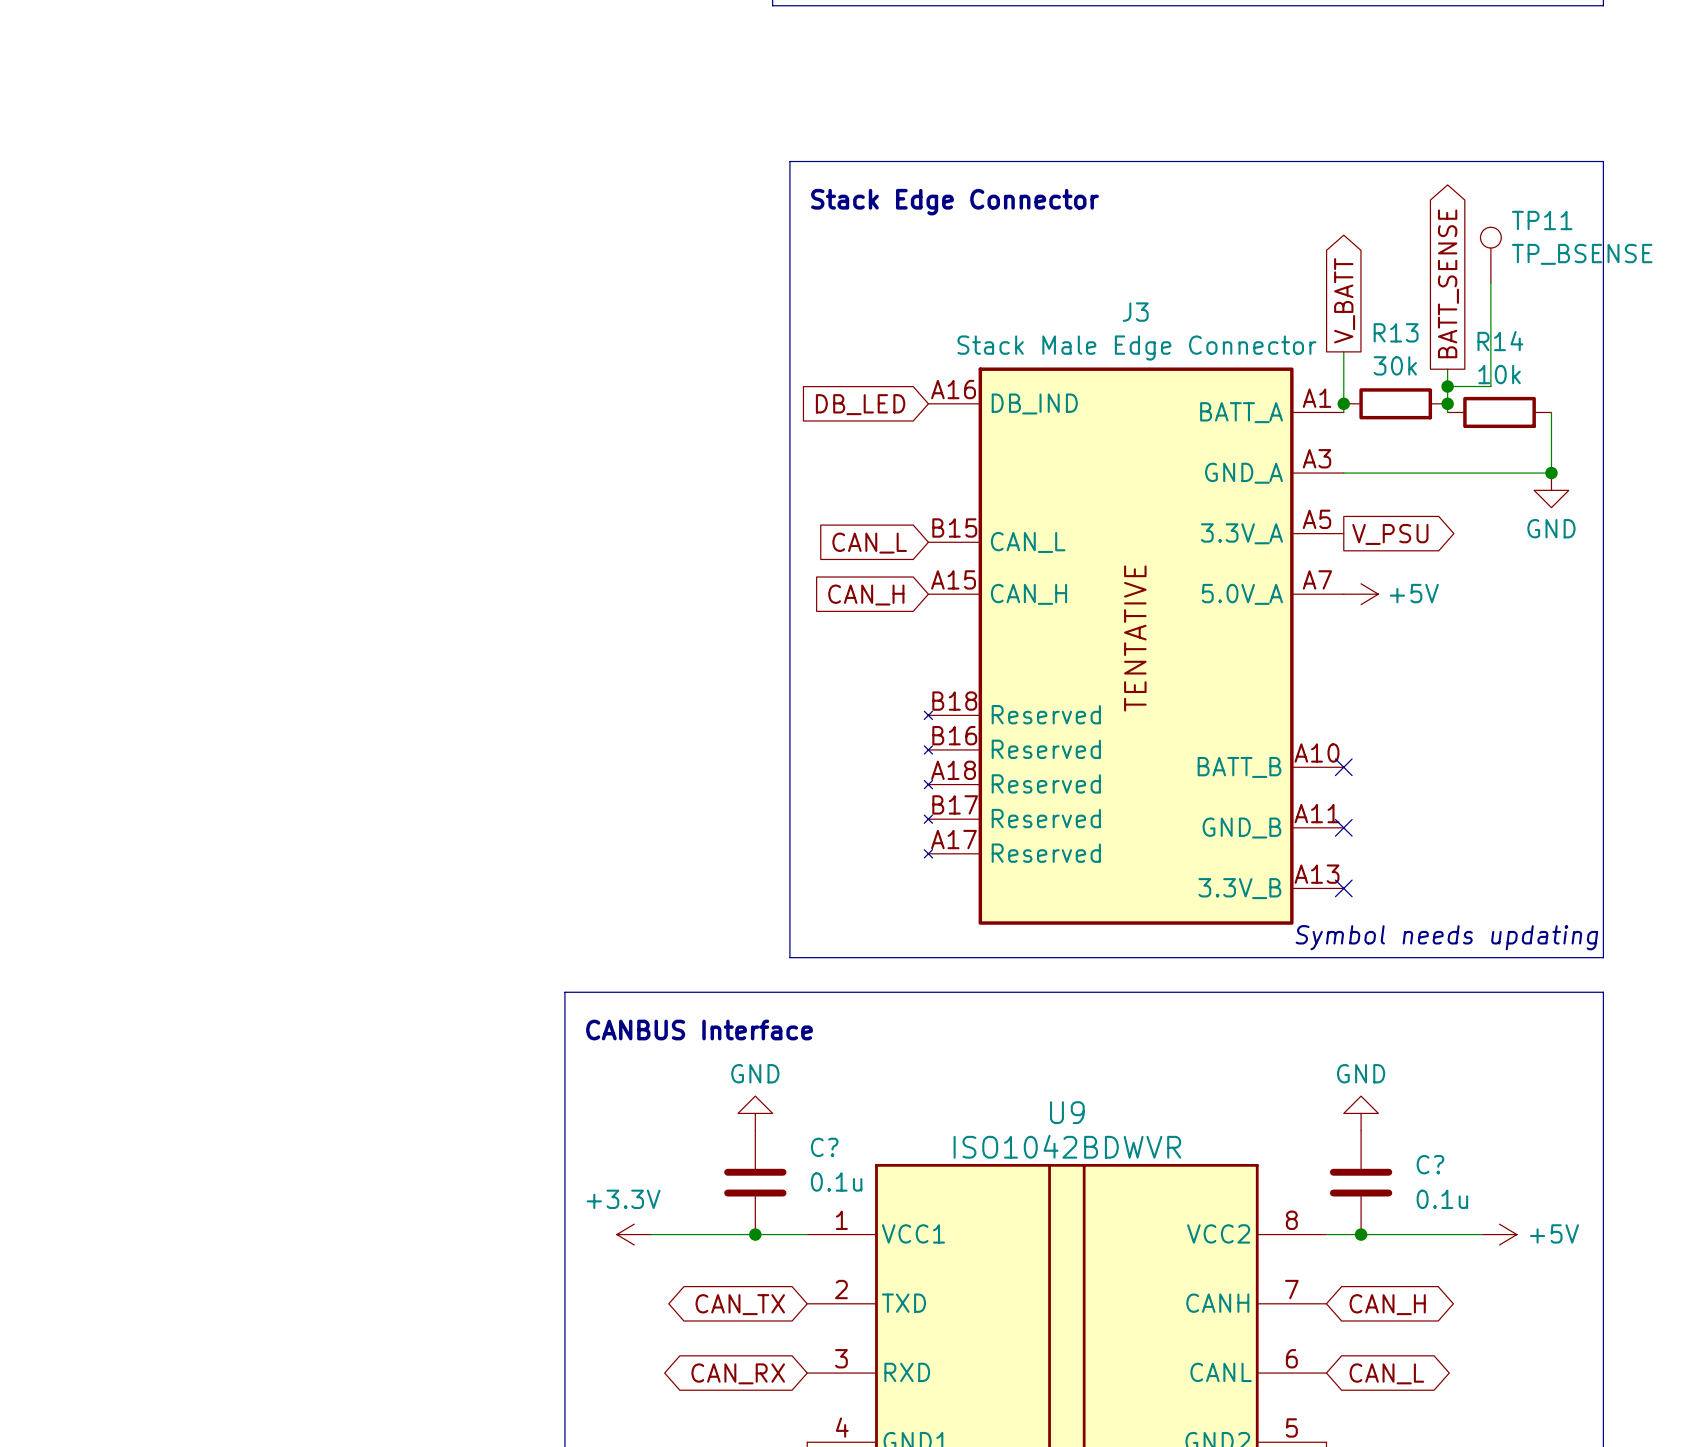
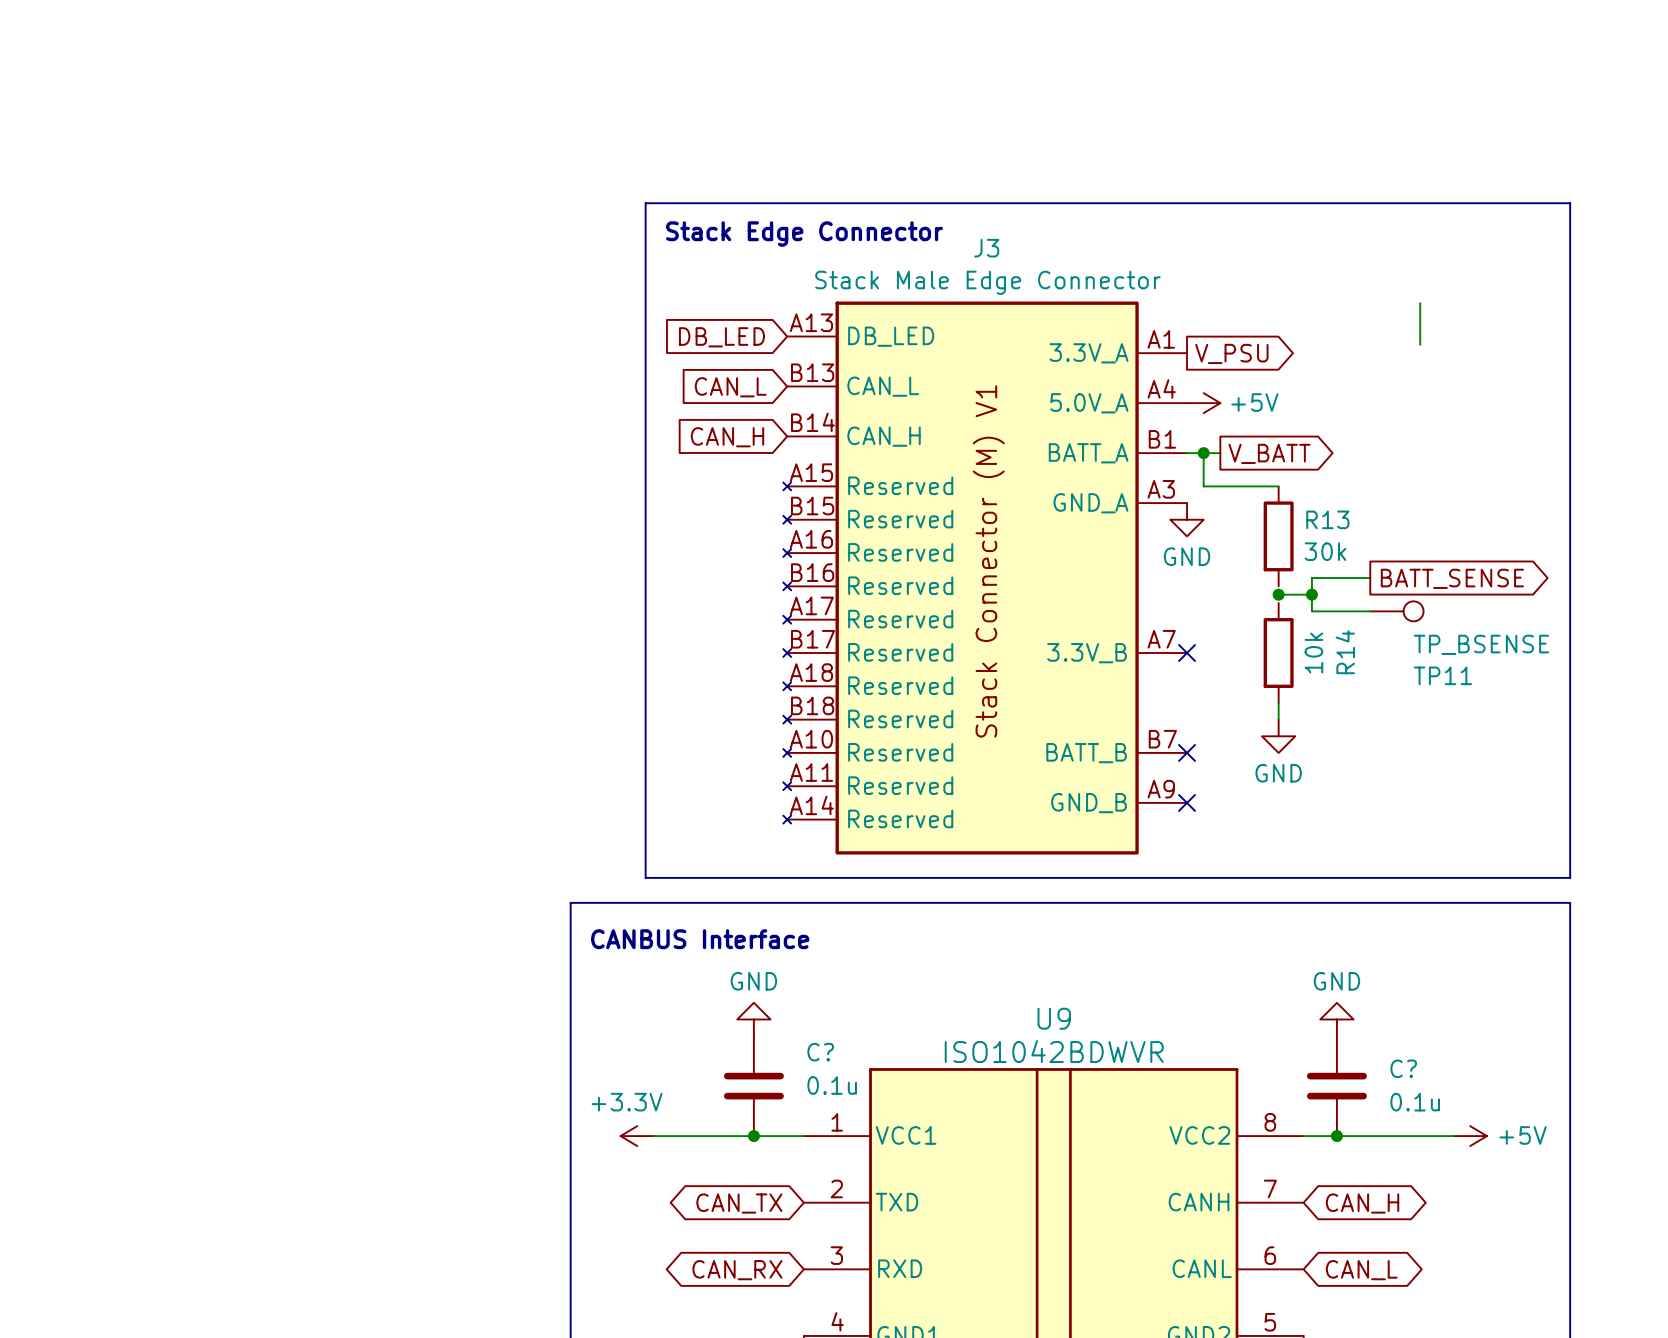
text position: Stack Edge Connector (954, 202) -> Stack Edge Connector (804, 234)
TP11 rotation: 0° (1490, 237) -> 90° clockwise (1413, 611)
TP11 position: (1490, 254) -> (1396, 611)
TP11 value position: TP_BSENSE (1582, 254) -> TP_BSENSE (1481, 644)
line: (1603, 265) (1603, 161) (789, 161) (789, 957) (1603, 957) -> (1570, 203) (645, 203) (645, 877) (1570, 877) (1570, 869)
wire: (1490, 282) (1490, 386) (1447, 386) -> none
global label rotation: 0° (1448, 283) -> 90° clockwise (1452, 578)
global label position: BATT_SENSE (1448, 283) -> BATT_SENSE (1452, 578)
global label rotation: 0° (1344, 300) -> 90° clockwise (1269, 453)
global label position: V_BATT (1344, 300) -> V_BATT (1269, 453)
wire: (1343, 351) (1343, 412) -> none
J3 symbol: [924, 367, 1344, 925] -> [783, 301, 1188, 855]
junction: (1447, 386) -> none
junction: (1343, 403) -> none
R13 rotation: 0° (1395, 403) -> 90° clockwise (1278, 536)
R13 position: (1395, 403) -> (1278, 536)
junction: (1447, 403) -> none
global label position: DB_LED (860, 404) -> DB_LED (721, 337)
R14 rotation: 0° (1499, 412) -> 90° clockwise (1278, 653)
R14 position: (1499, 412) -> (1278, 653)
wire: (1551, 412) (1551, 473) (1343, 473) -> none
junction: (1551, 473) -> none
power symbol: GND (1551, 490) -> none
junction: none -> (1203, 453)
global label position: V_PSU (1390, 534) -> V_PSU (1231, 353)
global label position: CAN_L (869, 543) -> CAN_L (730, 387)
power symbol: none -> GND (1187, 519)
power symbol position: +5V (1361, 594) -> +5V (1203, 403)
global label position: CAN_H (866, 595) -> CAN_H (727, 437)
wire: none -> (1370, 578) (1311, 578) (1311, 611) (1370, 611)
wire: none -> (1278, 594) (1311, 594)
junction: none -> (1278, 594)
junction: none -> (1311, 594)
no-connect mark: none -> (1187, 653)
no-connect mark: (1343, 767) -> none
wire: none -> (1278, 702) (1278, 719)
power symbol: none -> GND (1278, 736)
no-connect mark: (1343, 827) -> none
no-connect mark: none -> (1187, 752)
no-connect mark: none -> (1187, 802)
no-connect mark: (1343, 888) -> none
text: Symbol needs updating (1446, 937) -> none

